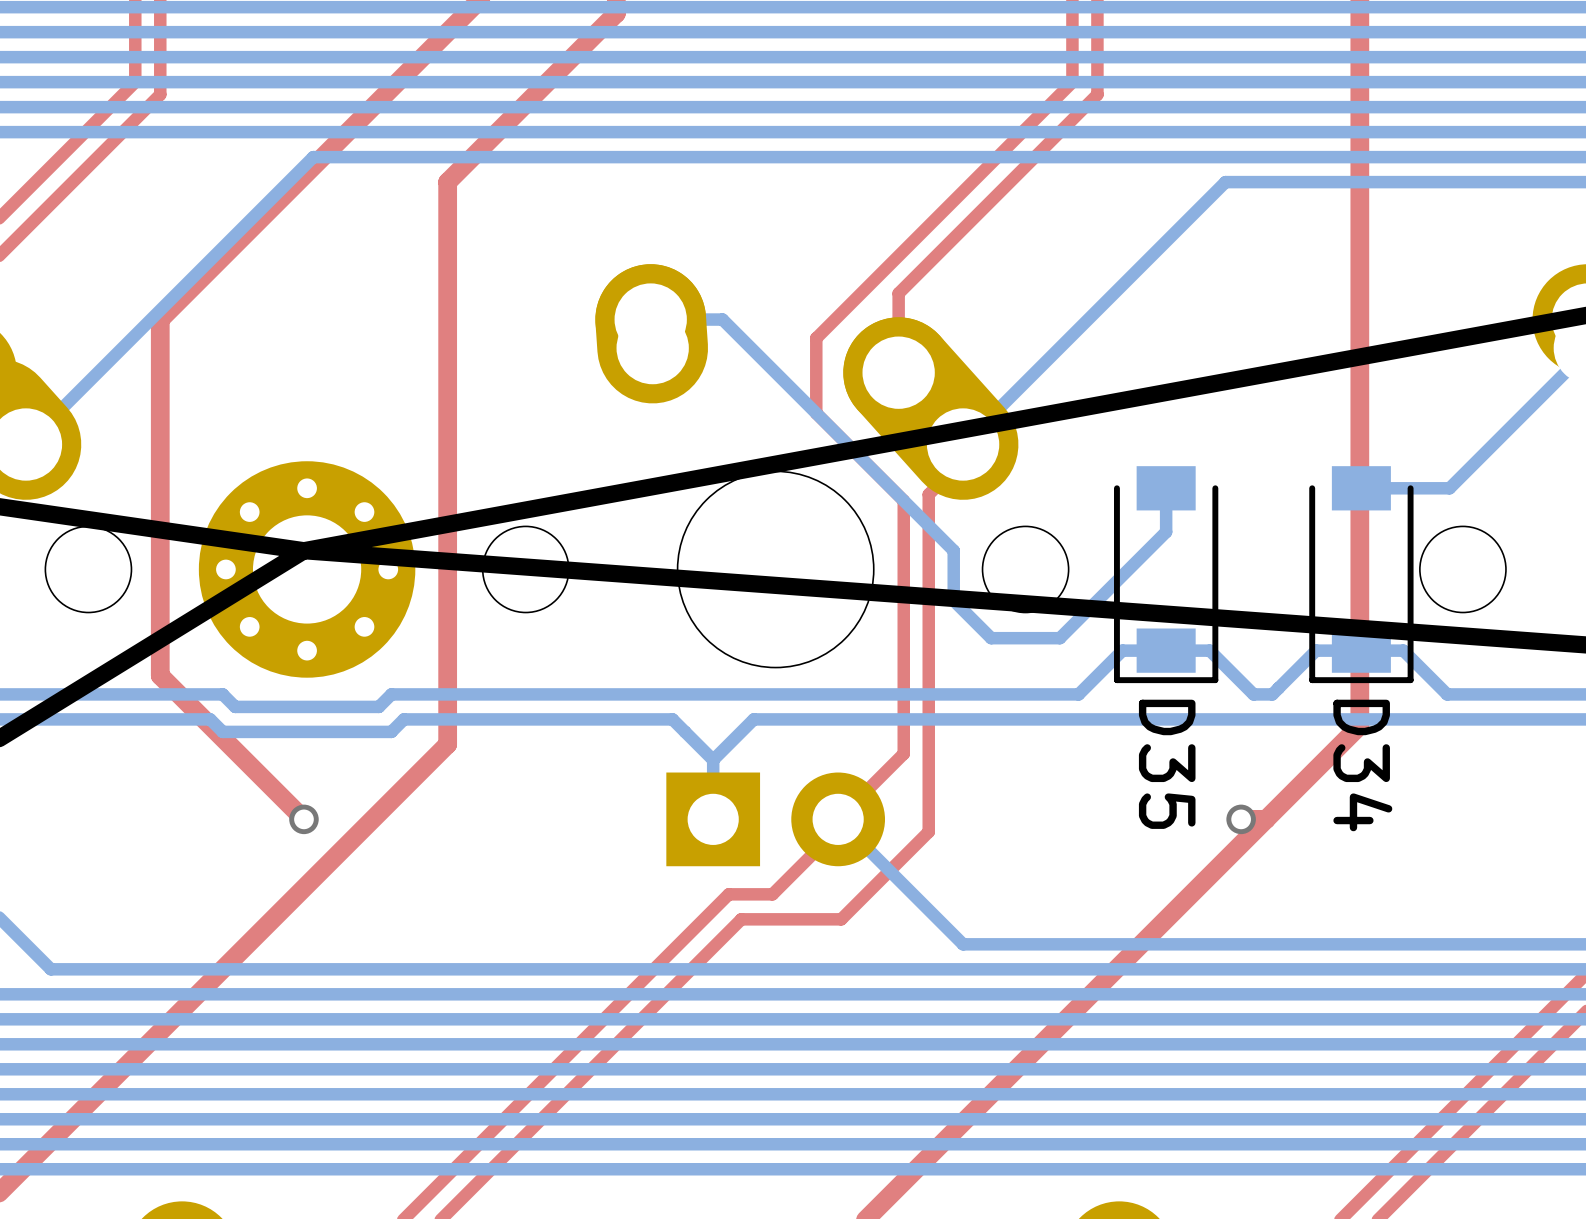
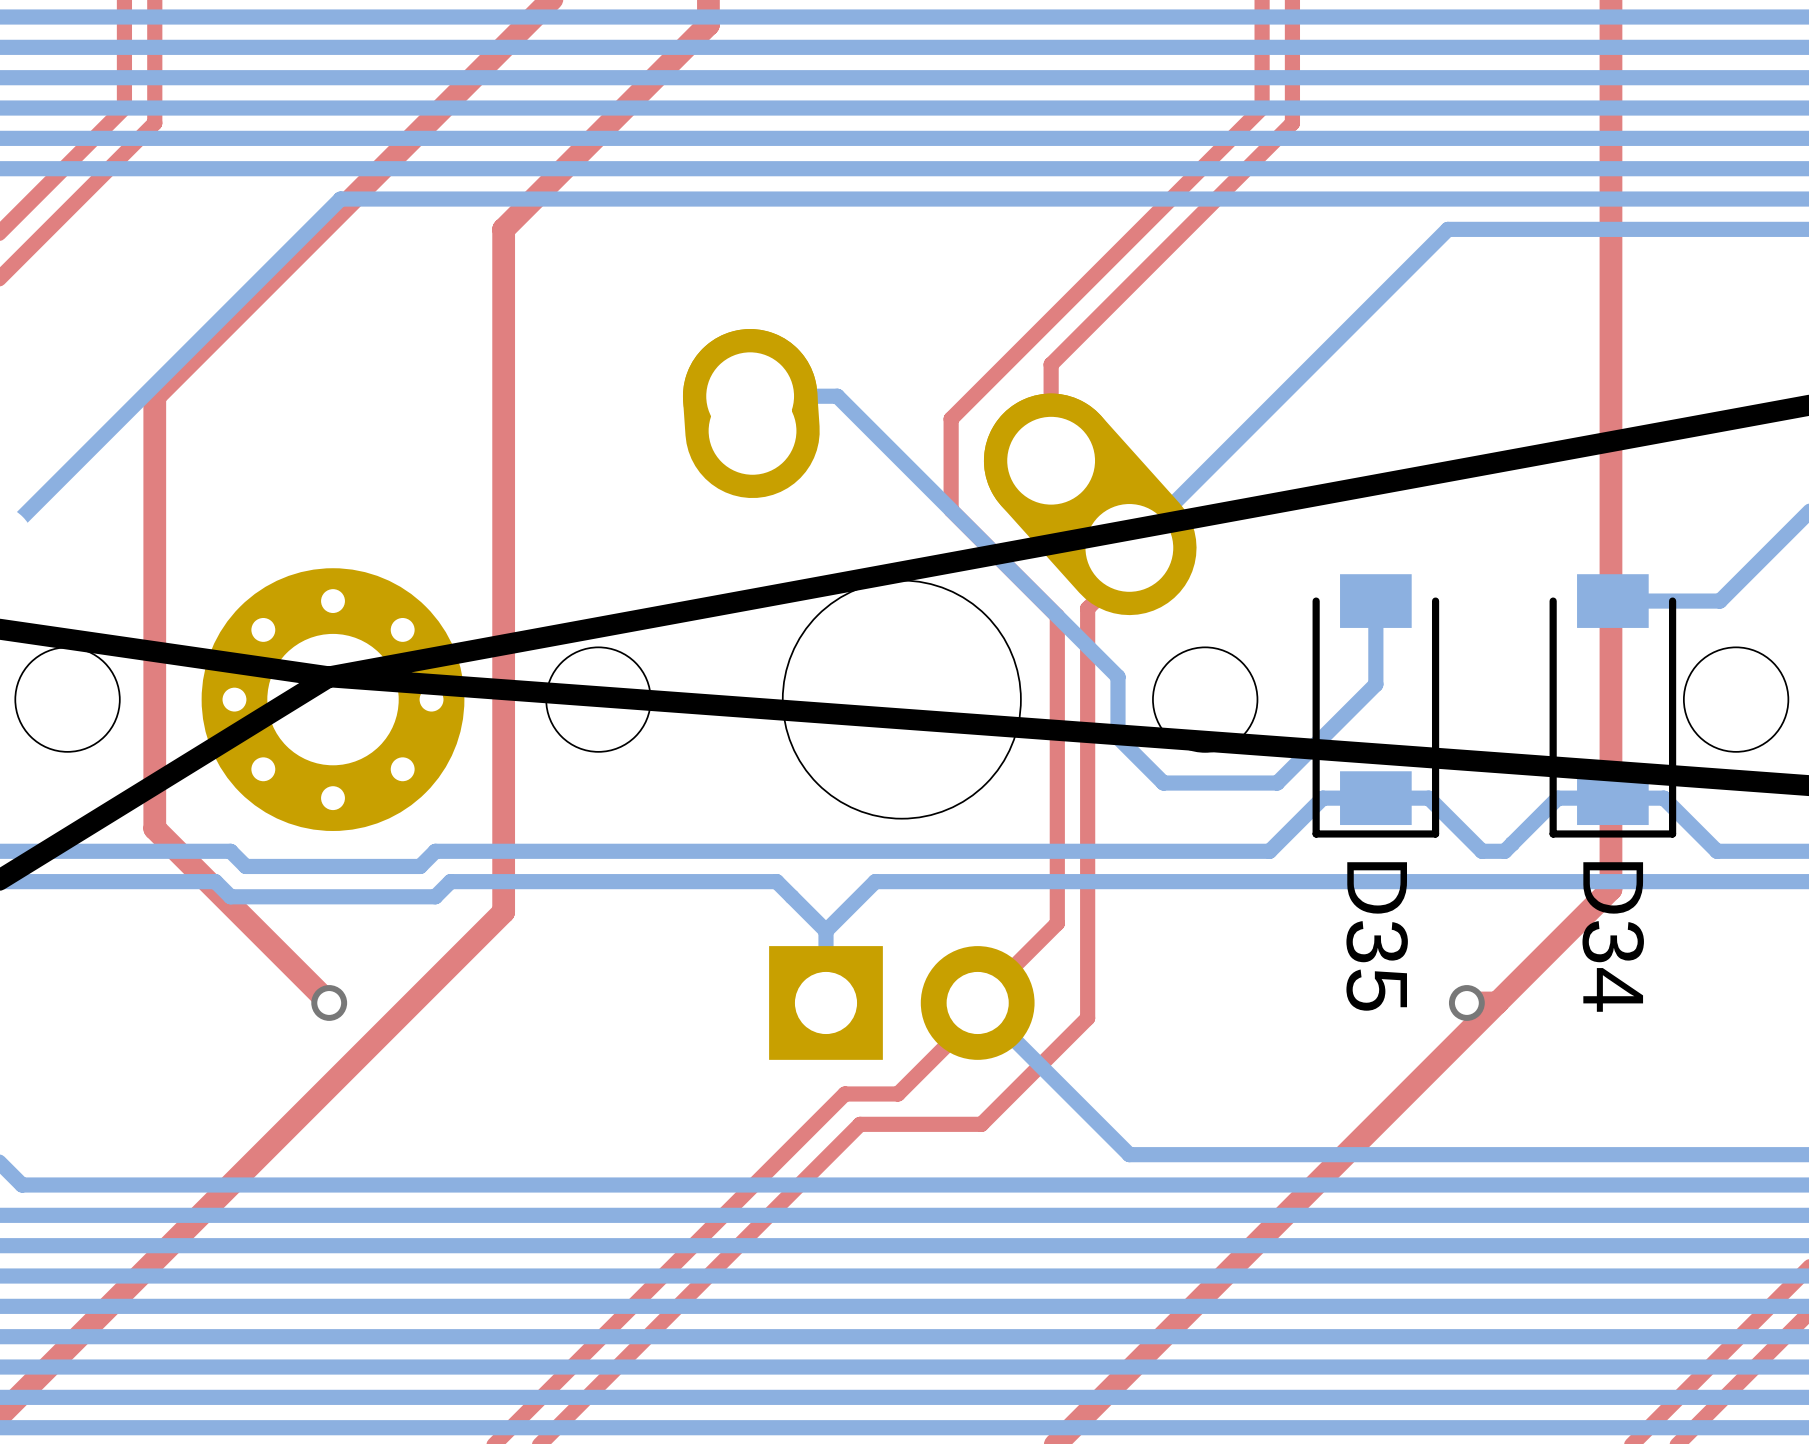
bottom track: (1166, 531) (1059, 638) -> (1375, 654) (1375, 684) (1277, 783) (1246, 783)

